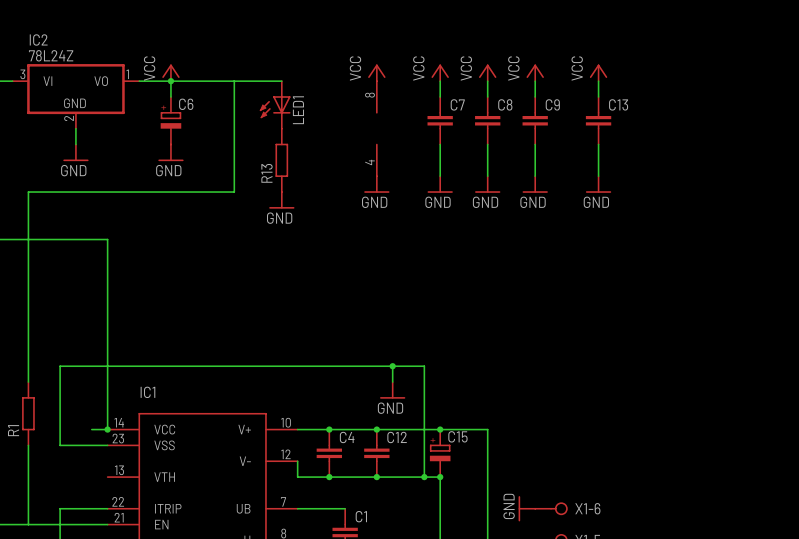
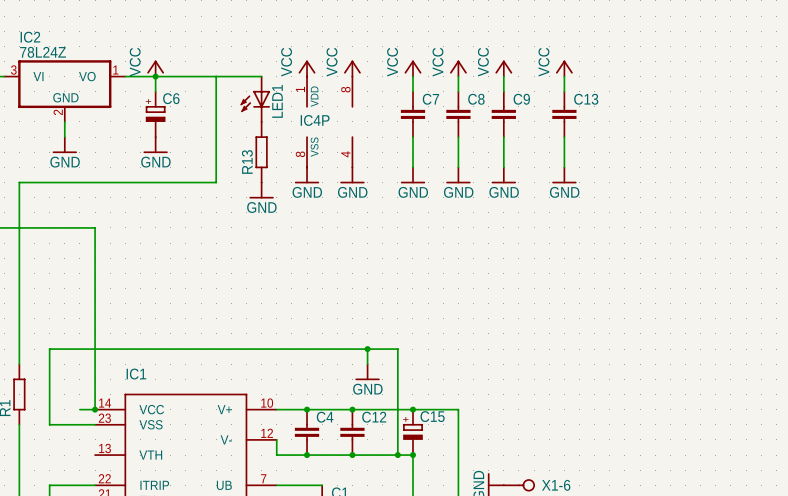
power symbol: none -> VCC (307, 68)
IC4P: none -> (307, 121)
power symbol: none -> GND (307, 175)

